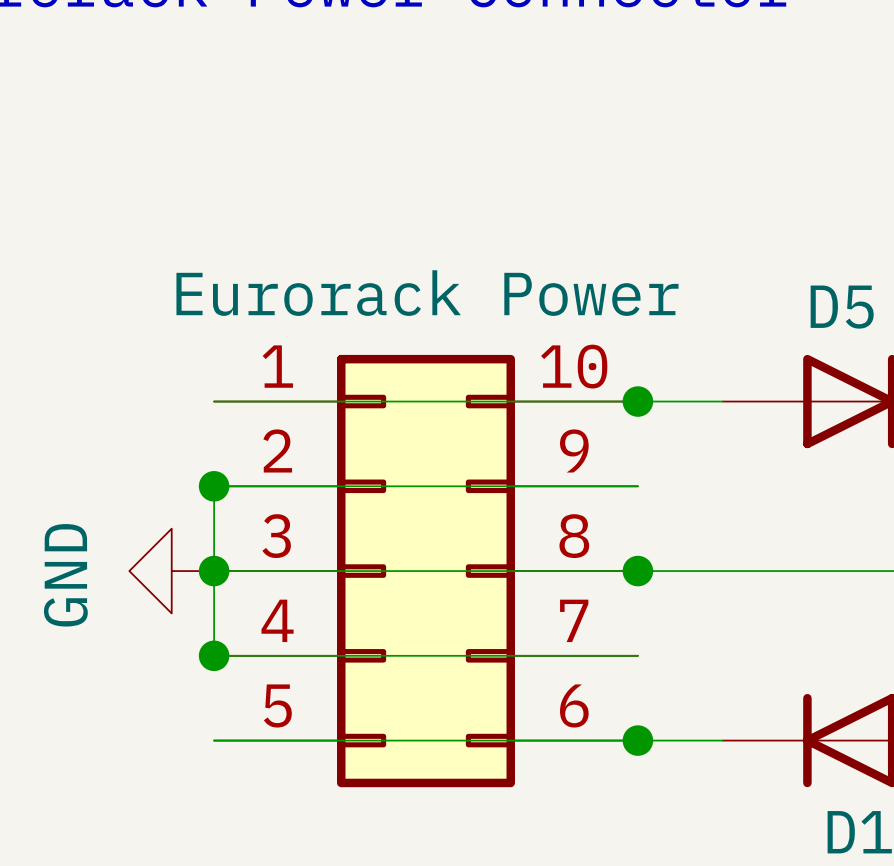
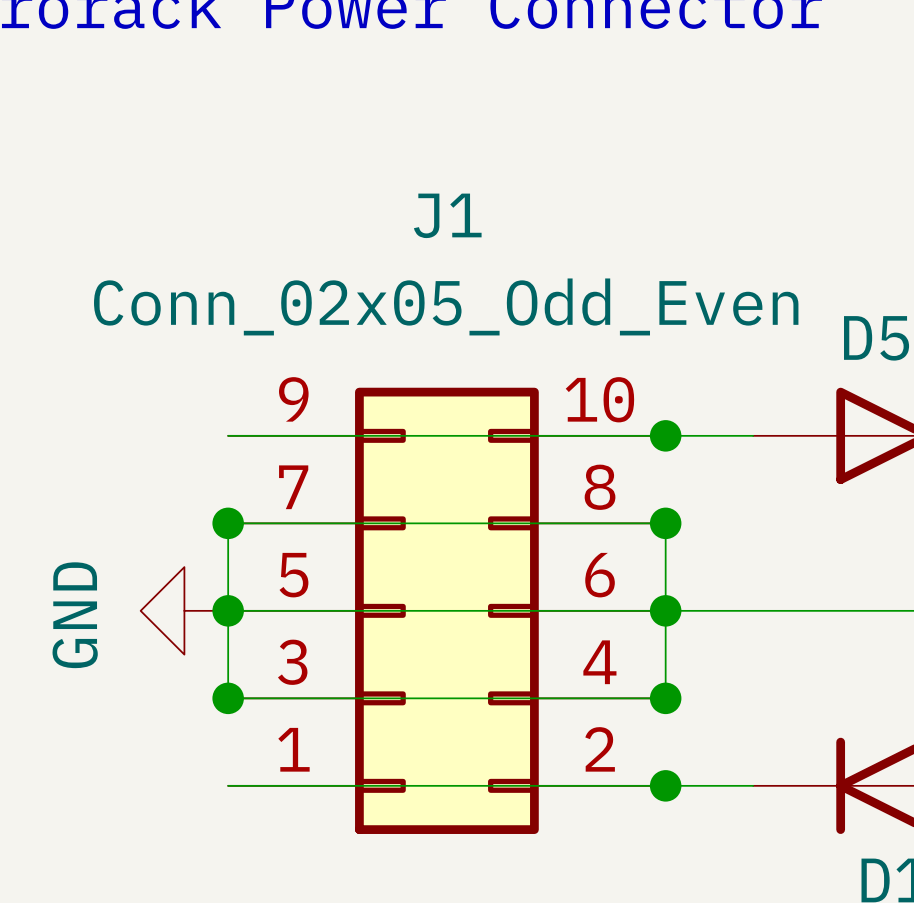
J1 name: none -> J1 (447, 215)
J1 value: Eurorack Power (427, 293) -> Conn_02x05_Odd_Even (446, 306)
J1 symbol: [214, 354, 638, 788] -> [228, 387, 666, 834]
wire: none -> (665, 523) (665, 698)
junction: none -> (665, 523)
junction: none -> (665, 698)

